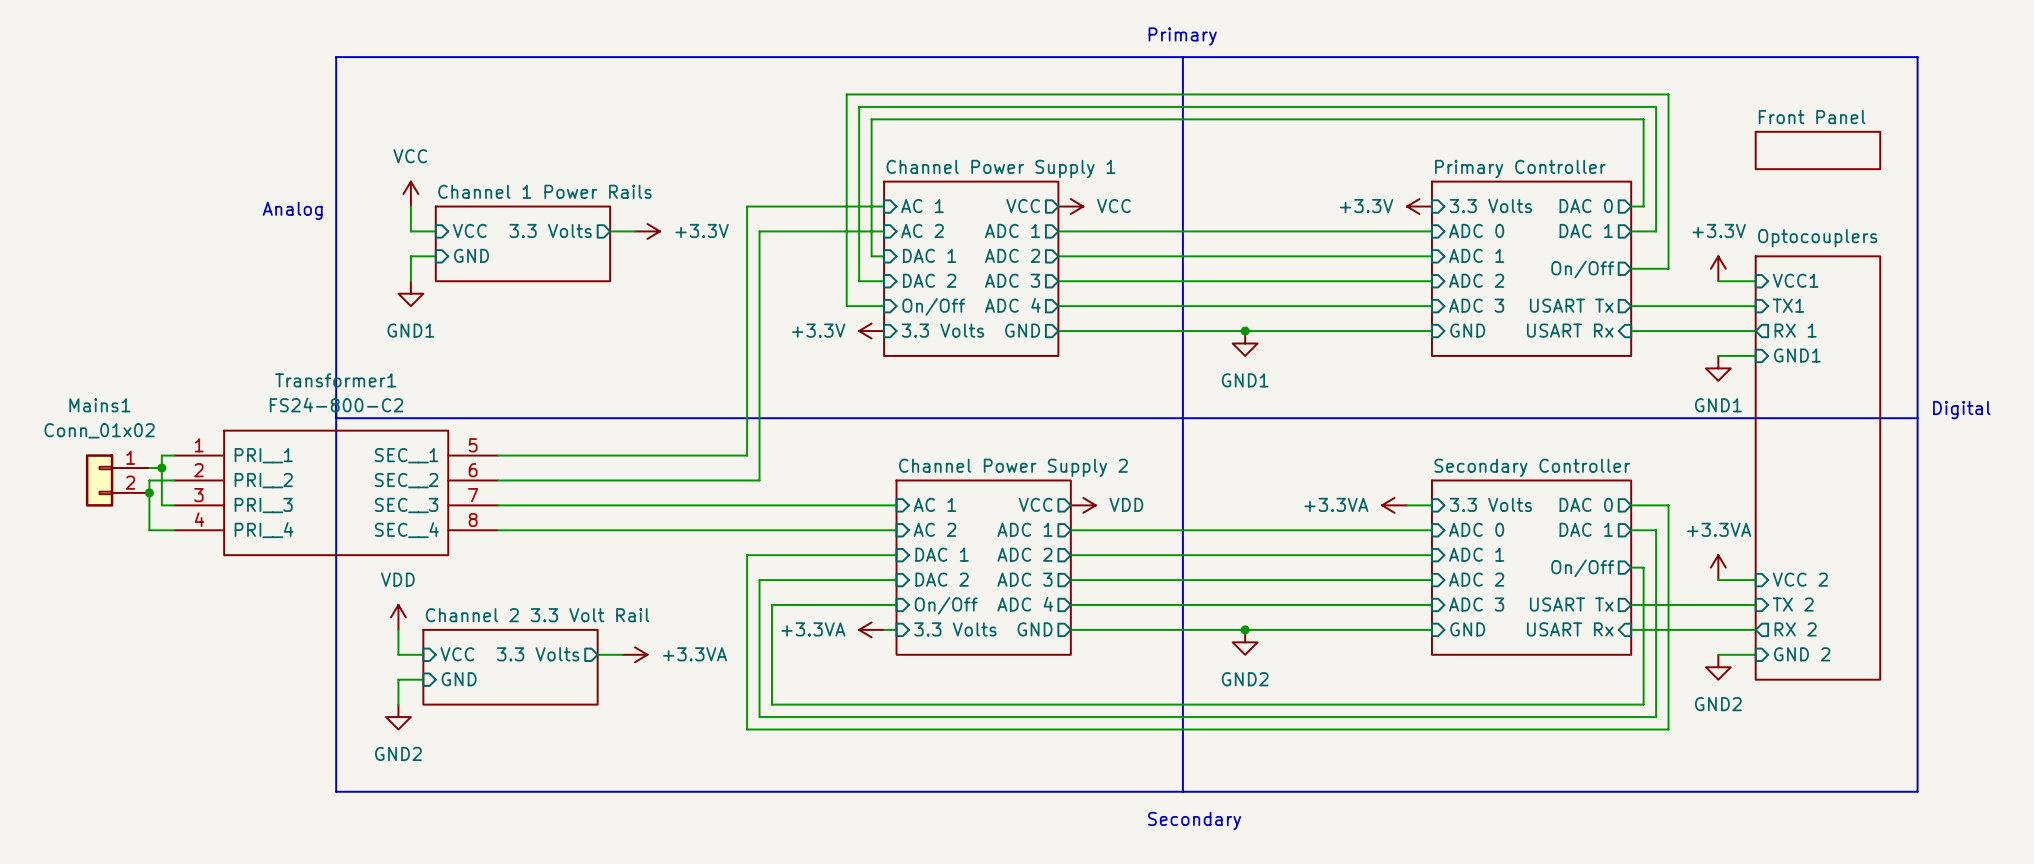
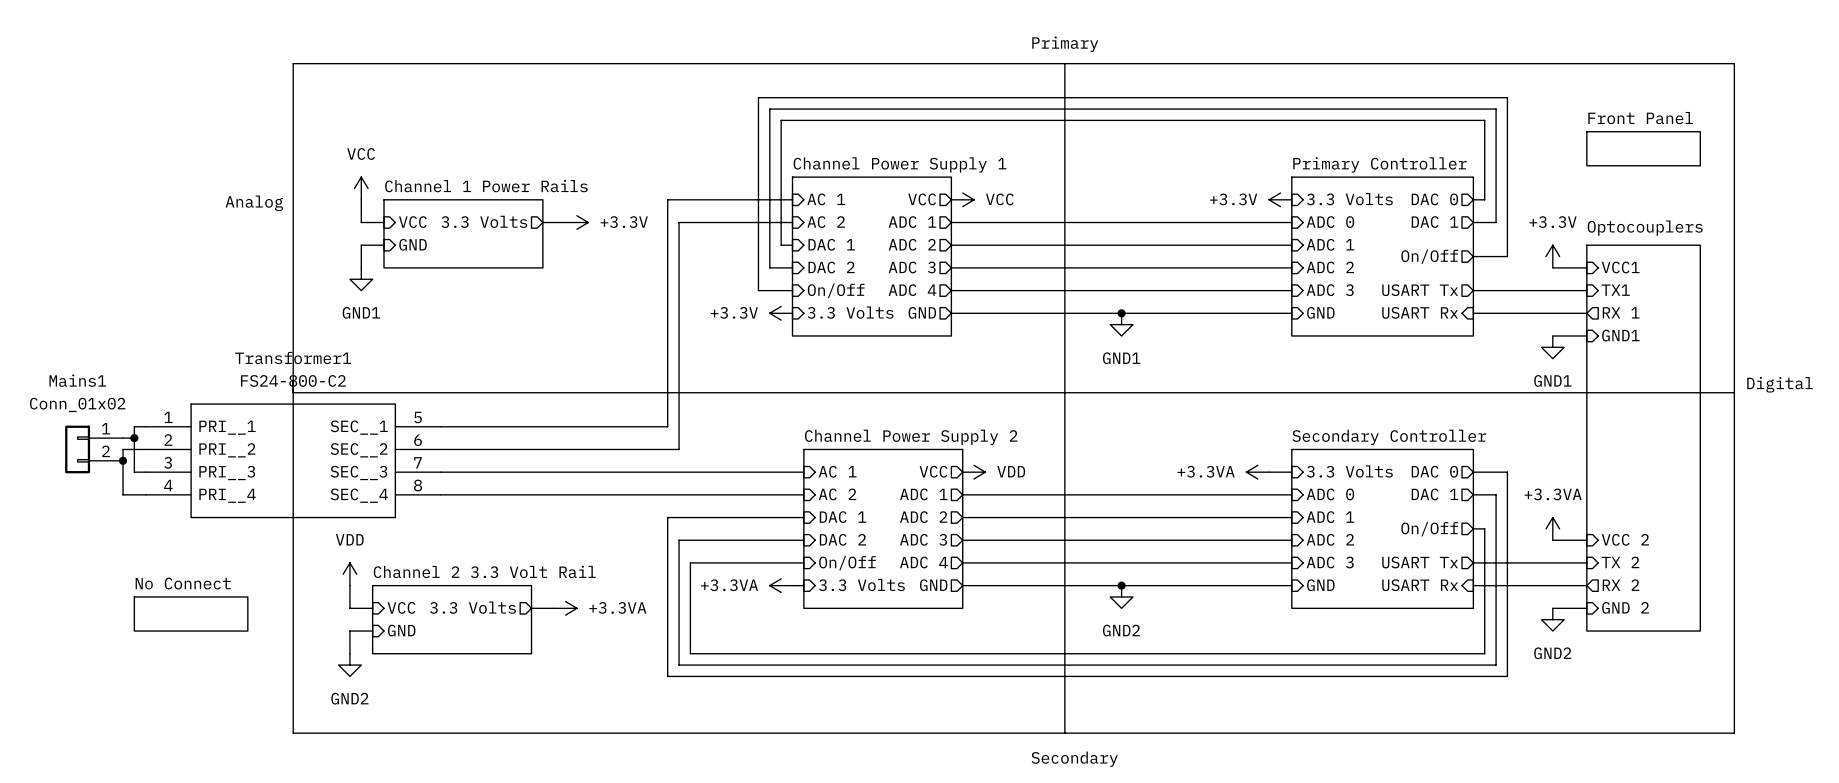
sheet No Connect: none -> (191, 614)

